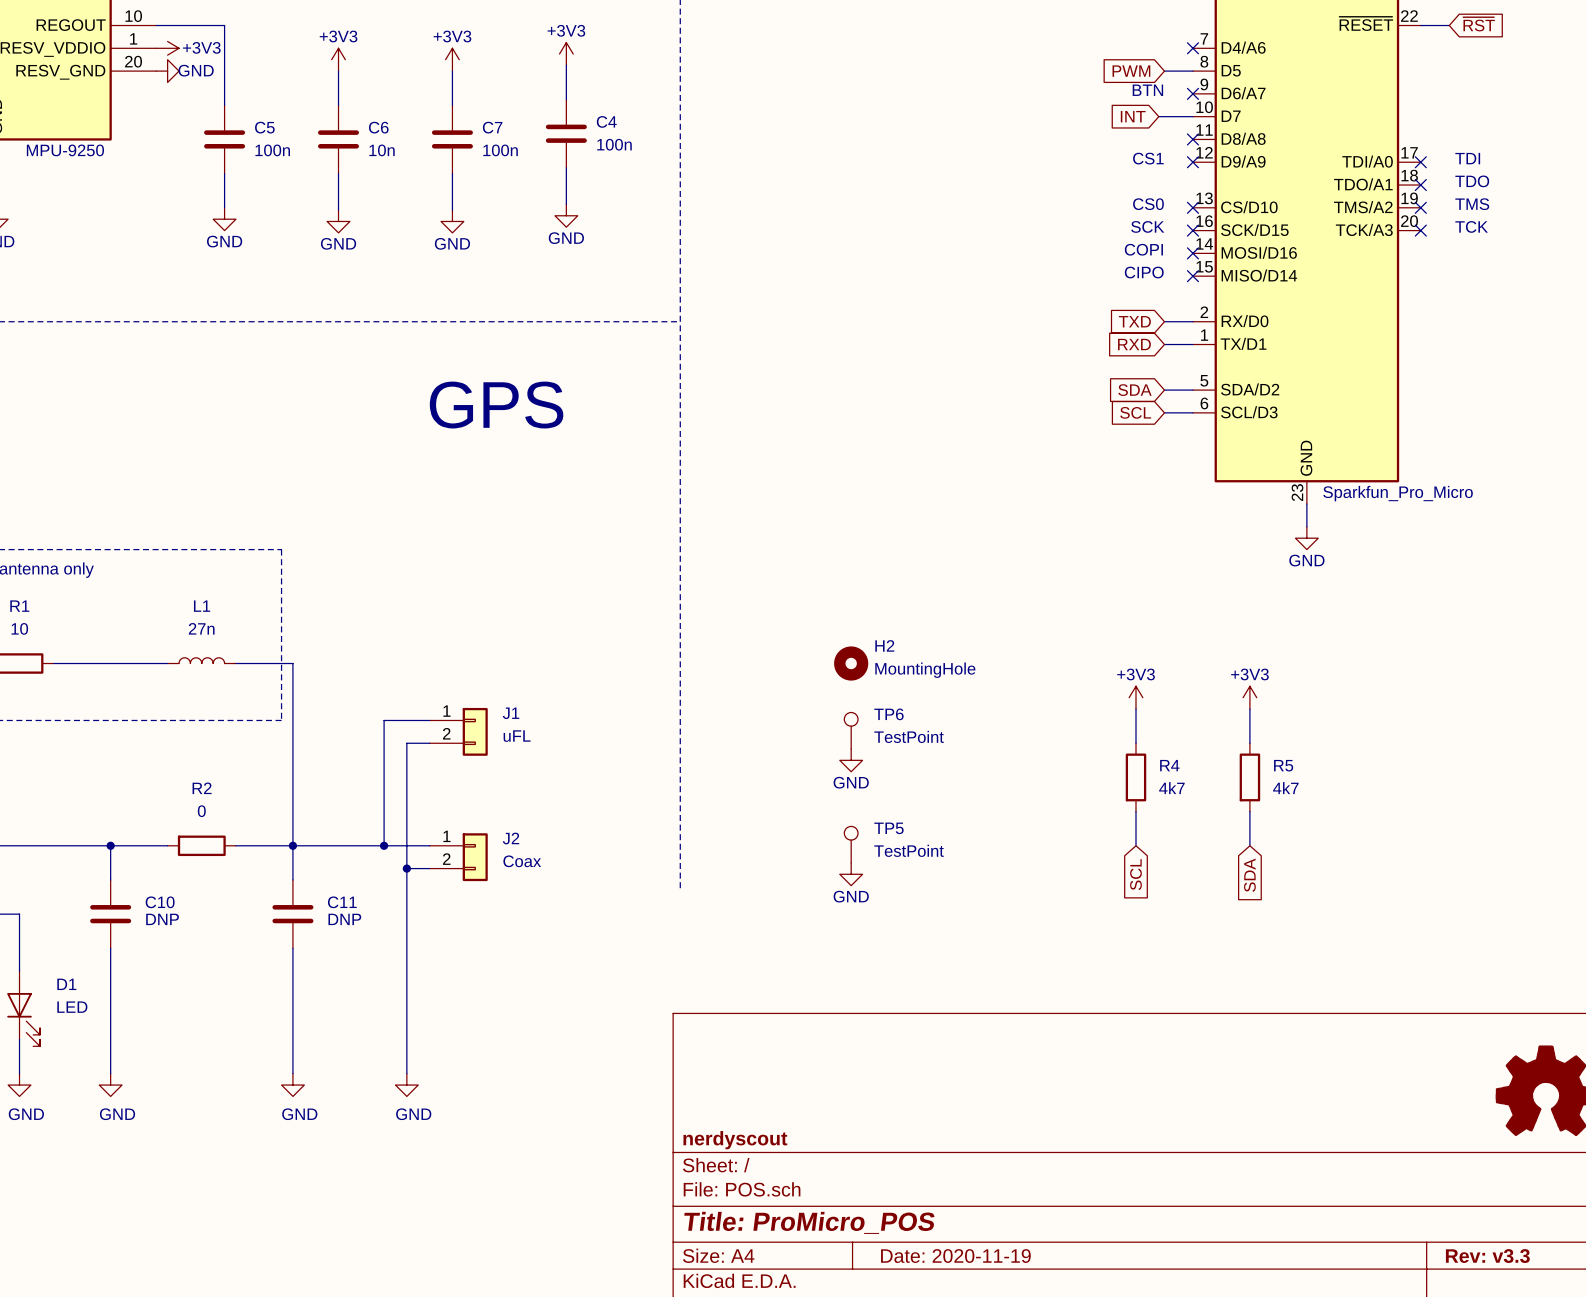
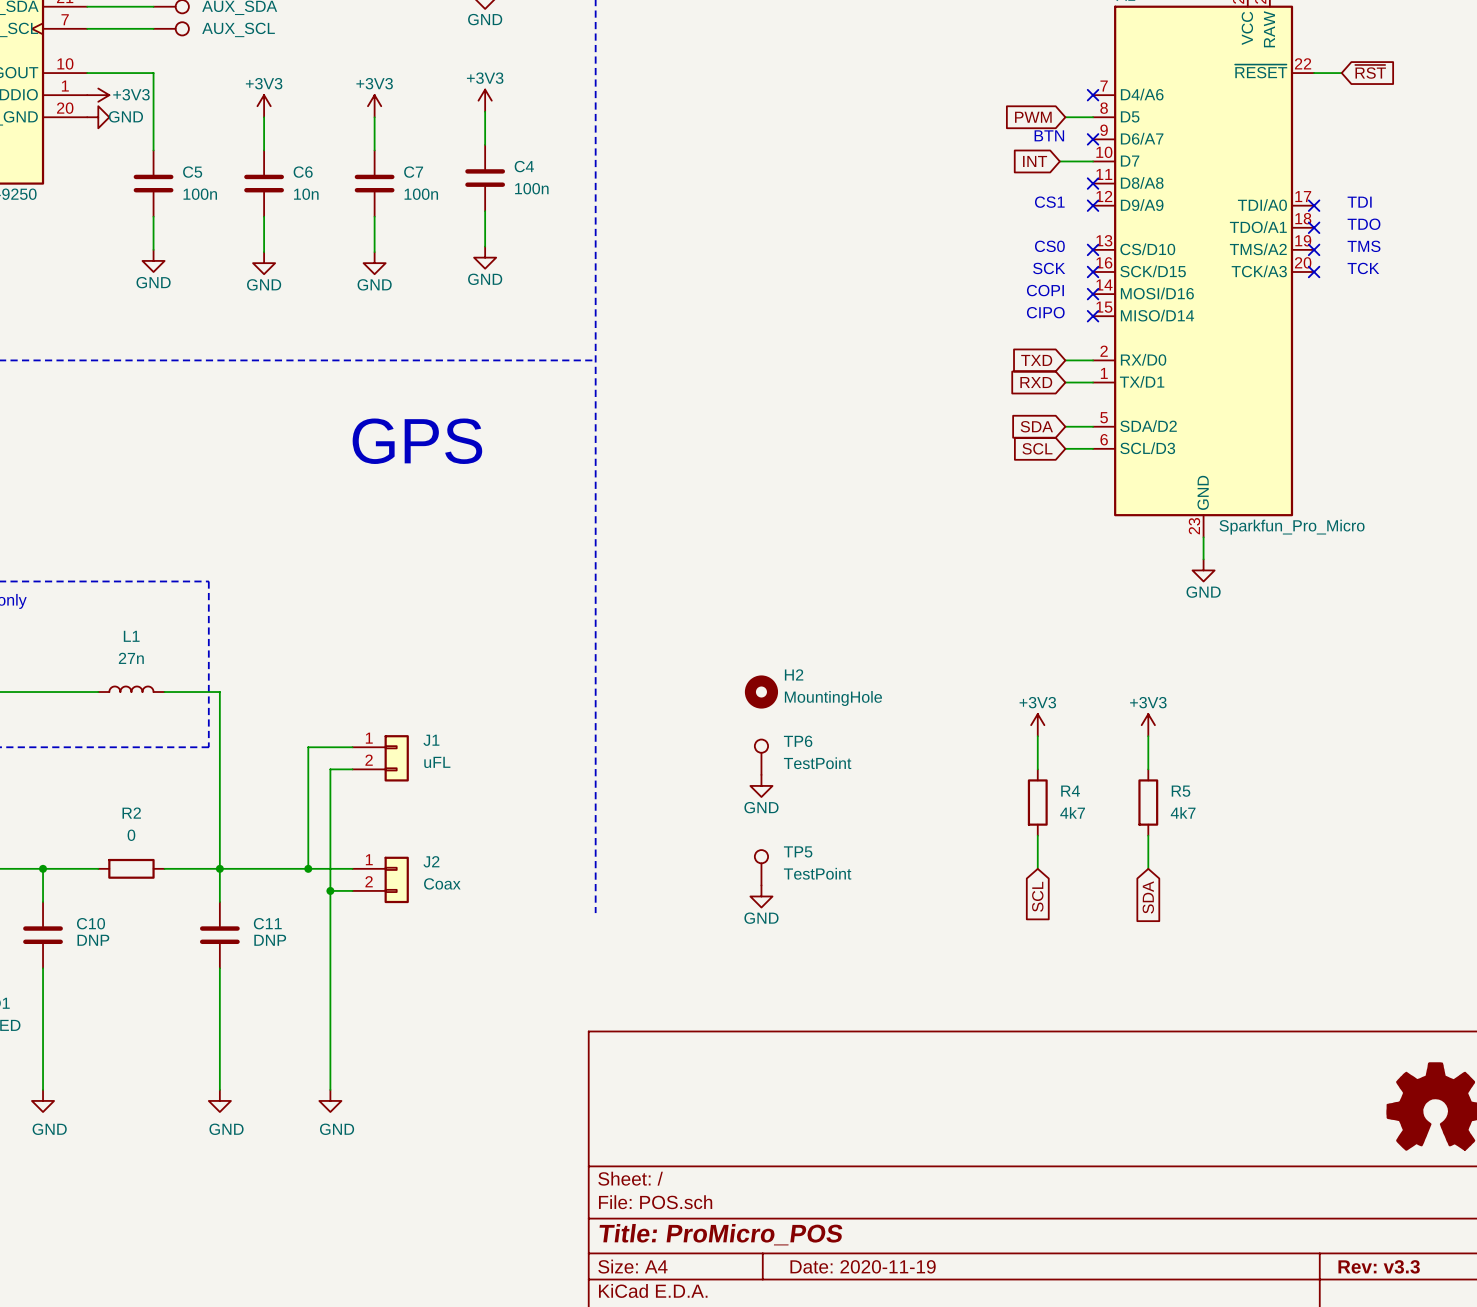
title block: nerdyscout (735, 1140) -> none

